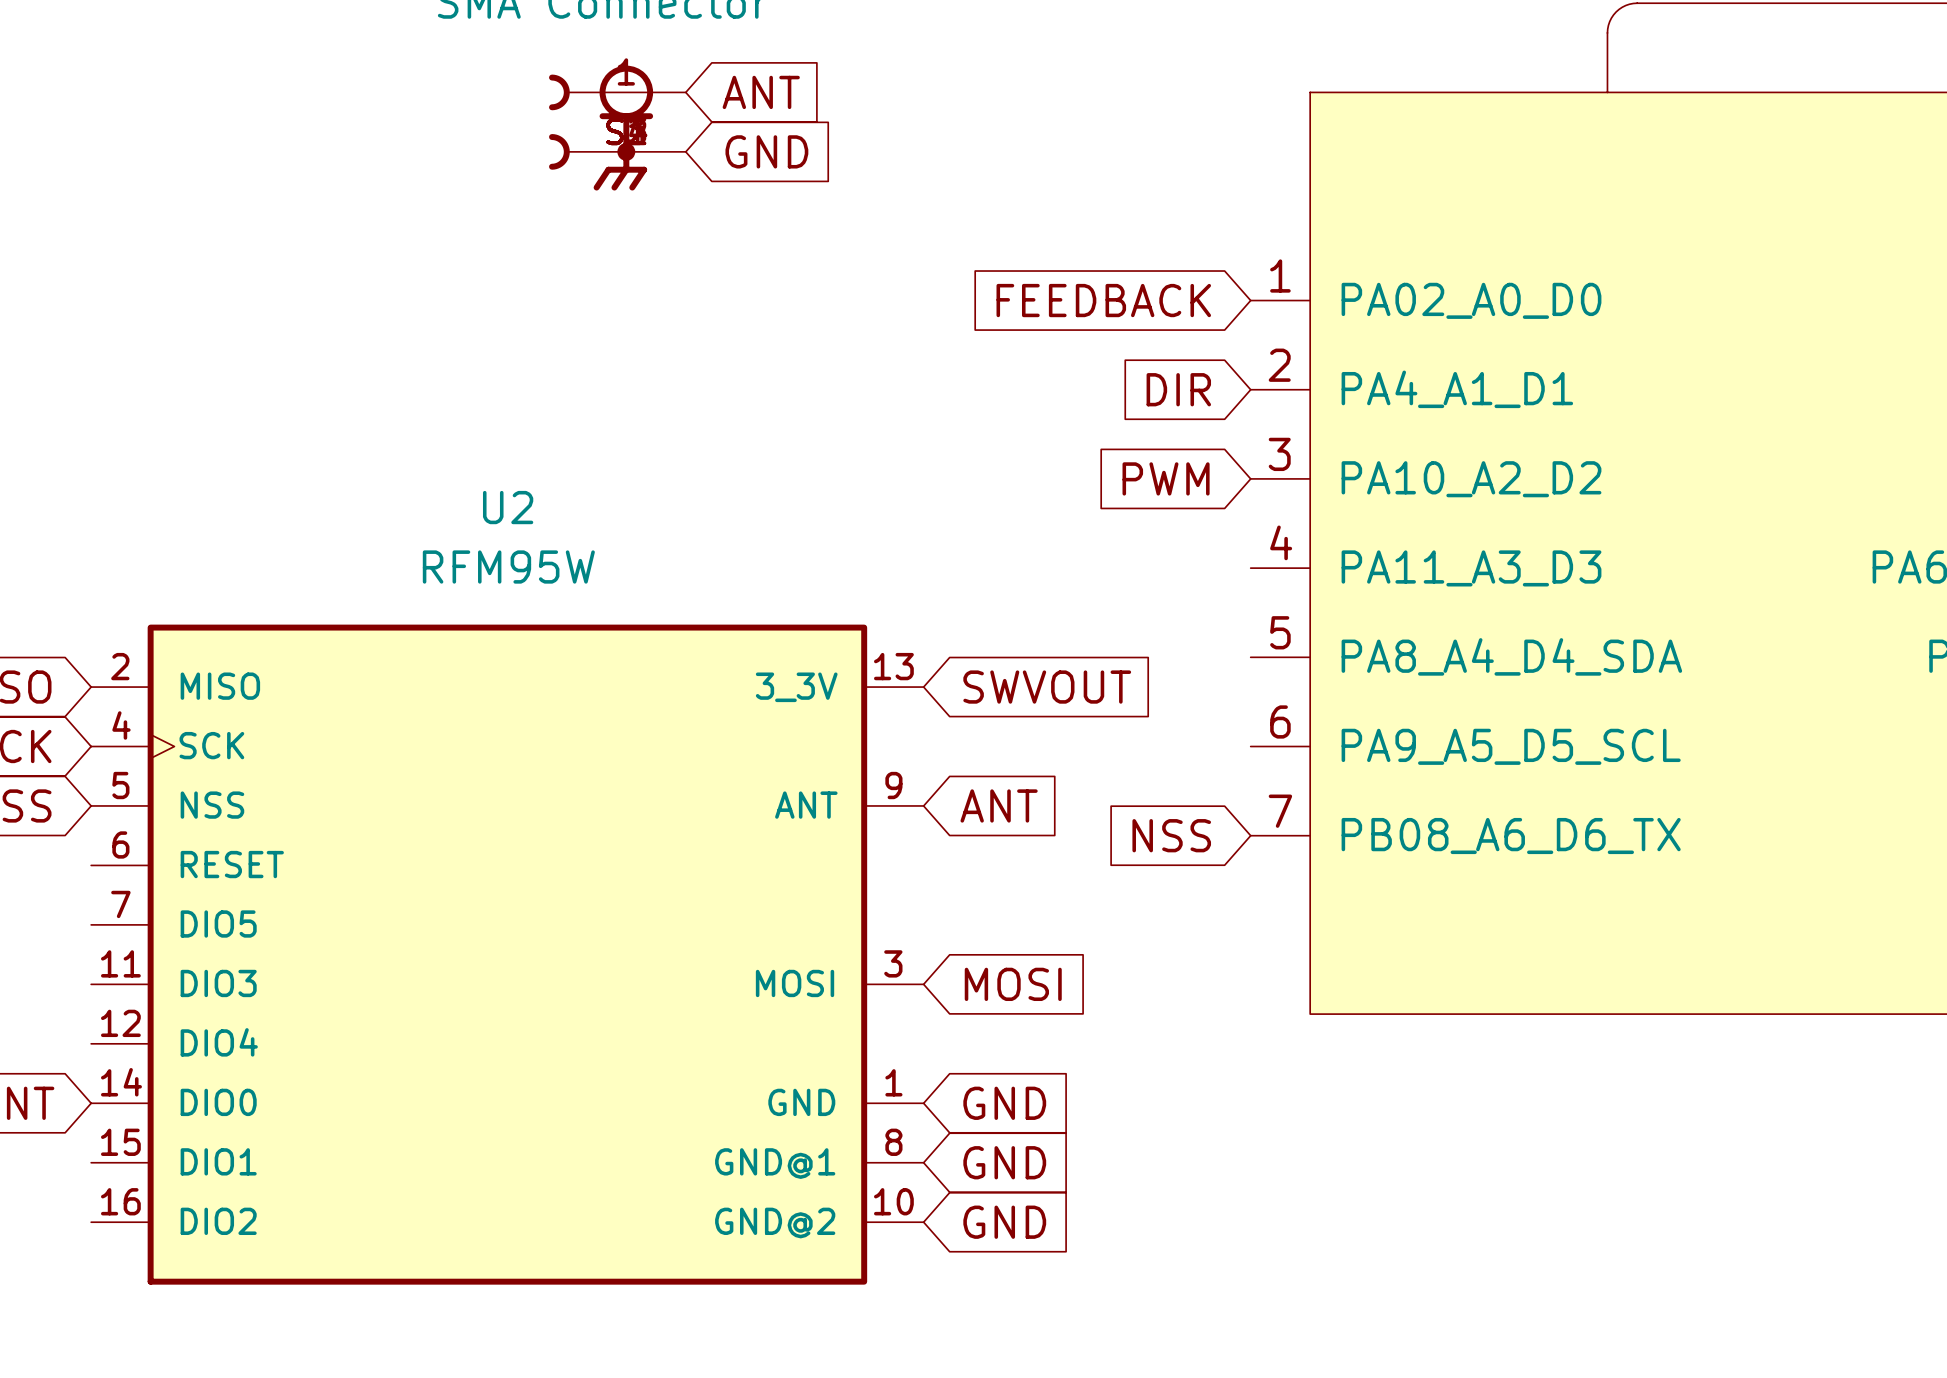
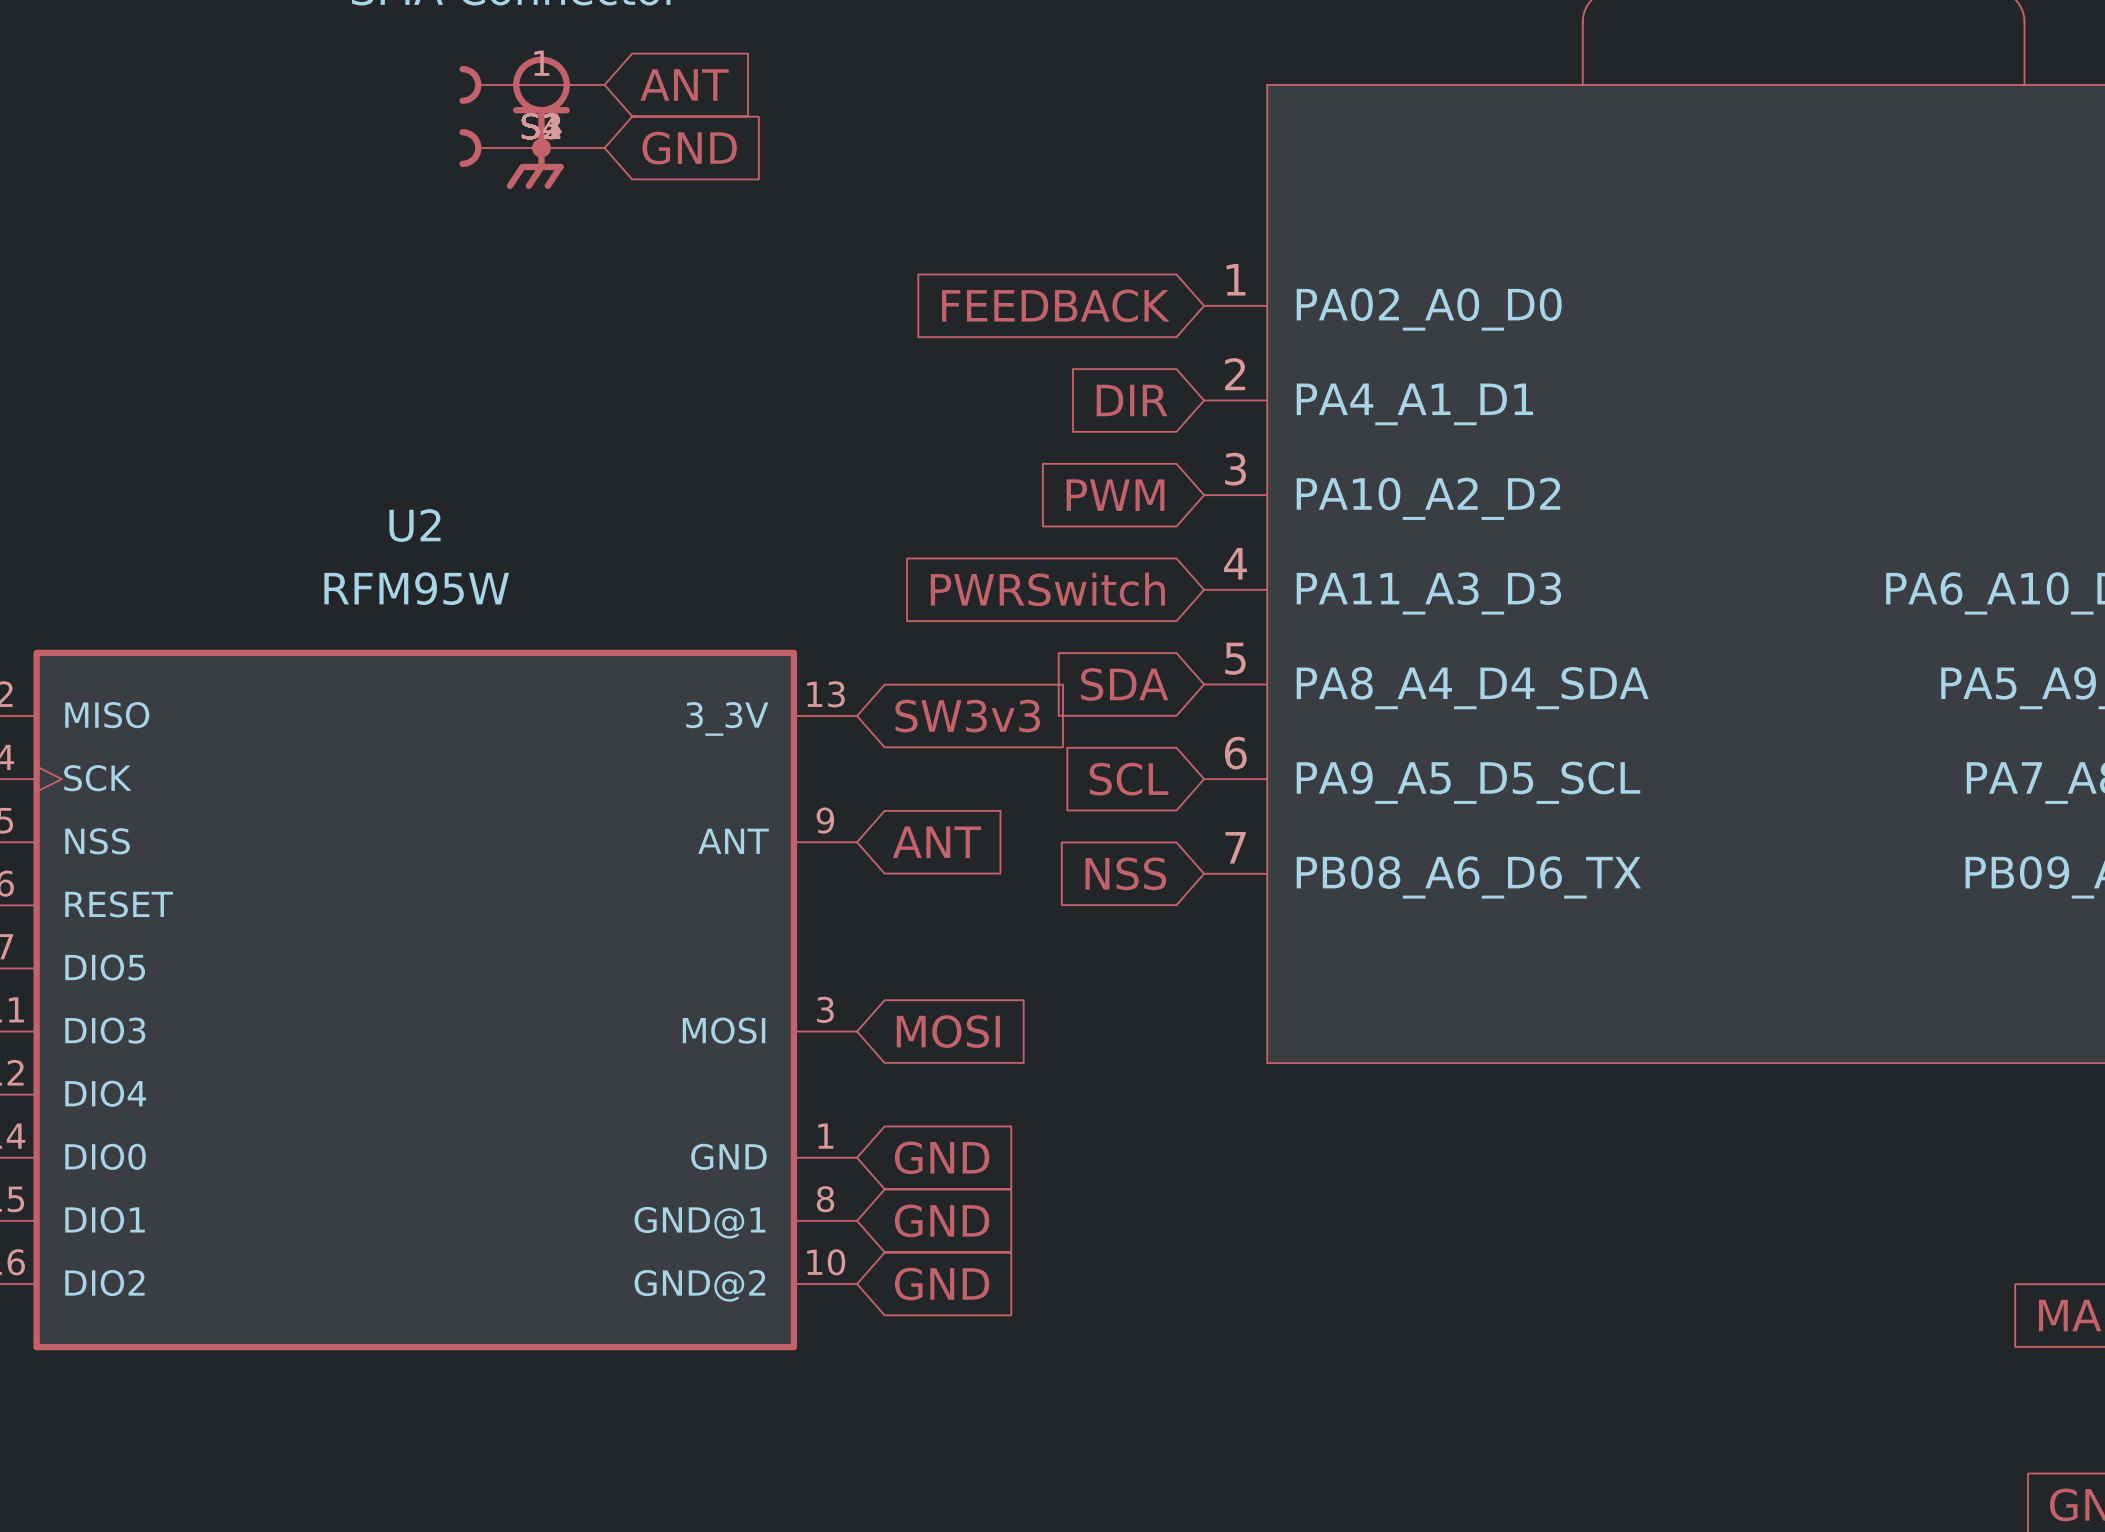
global label: none -> PWRSwitch (1047, 589)
global label: none -> SDA (1124, 684)
global label: SWVOUT (1047, 687) -> SW3v3 (967, 716)
global label: none -> SCL (1129, 779)

